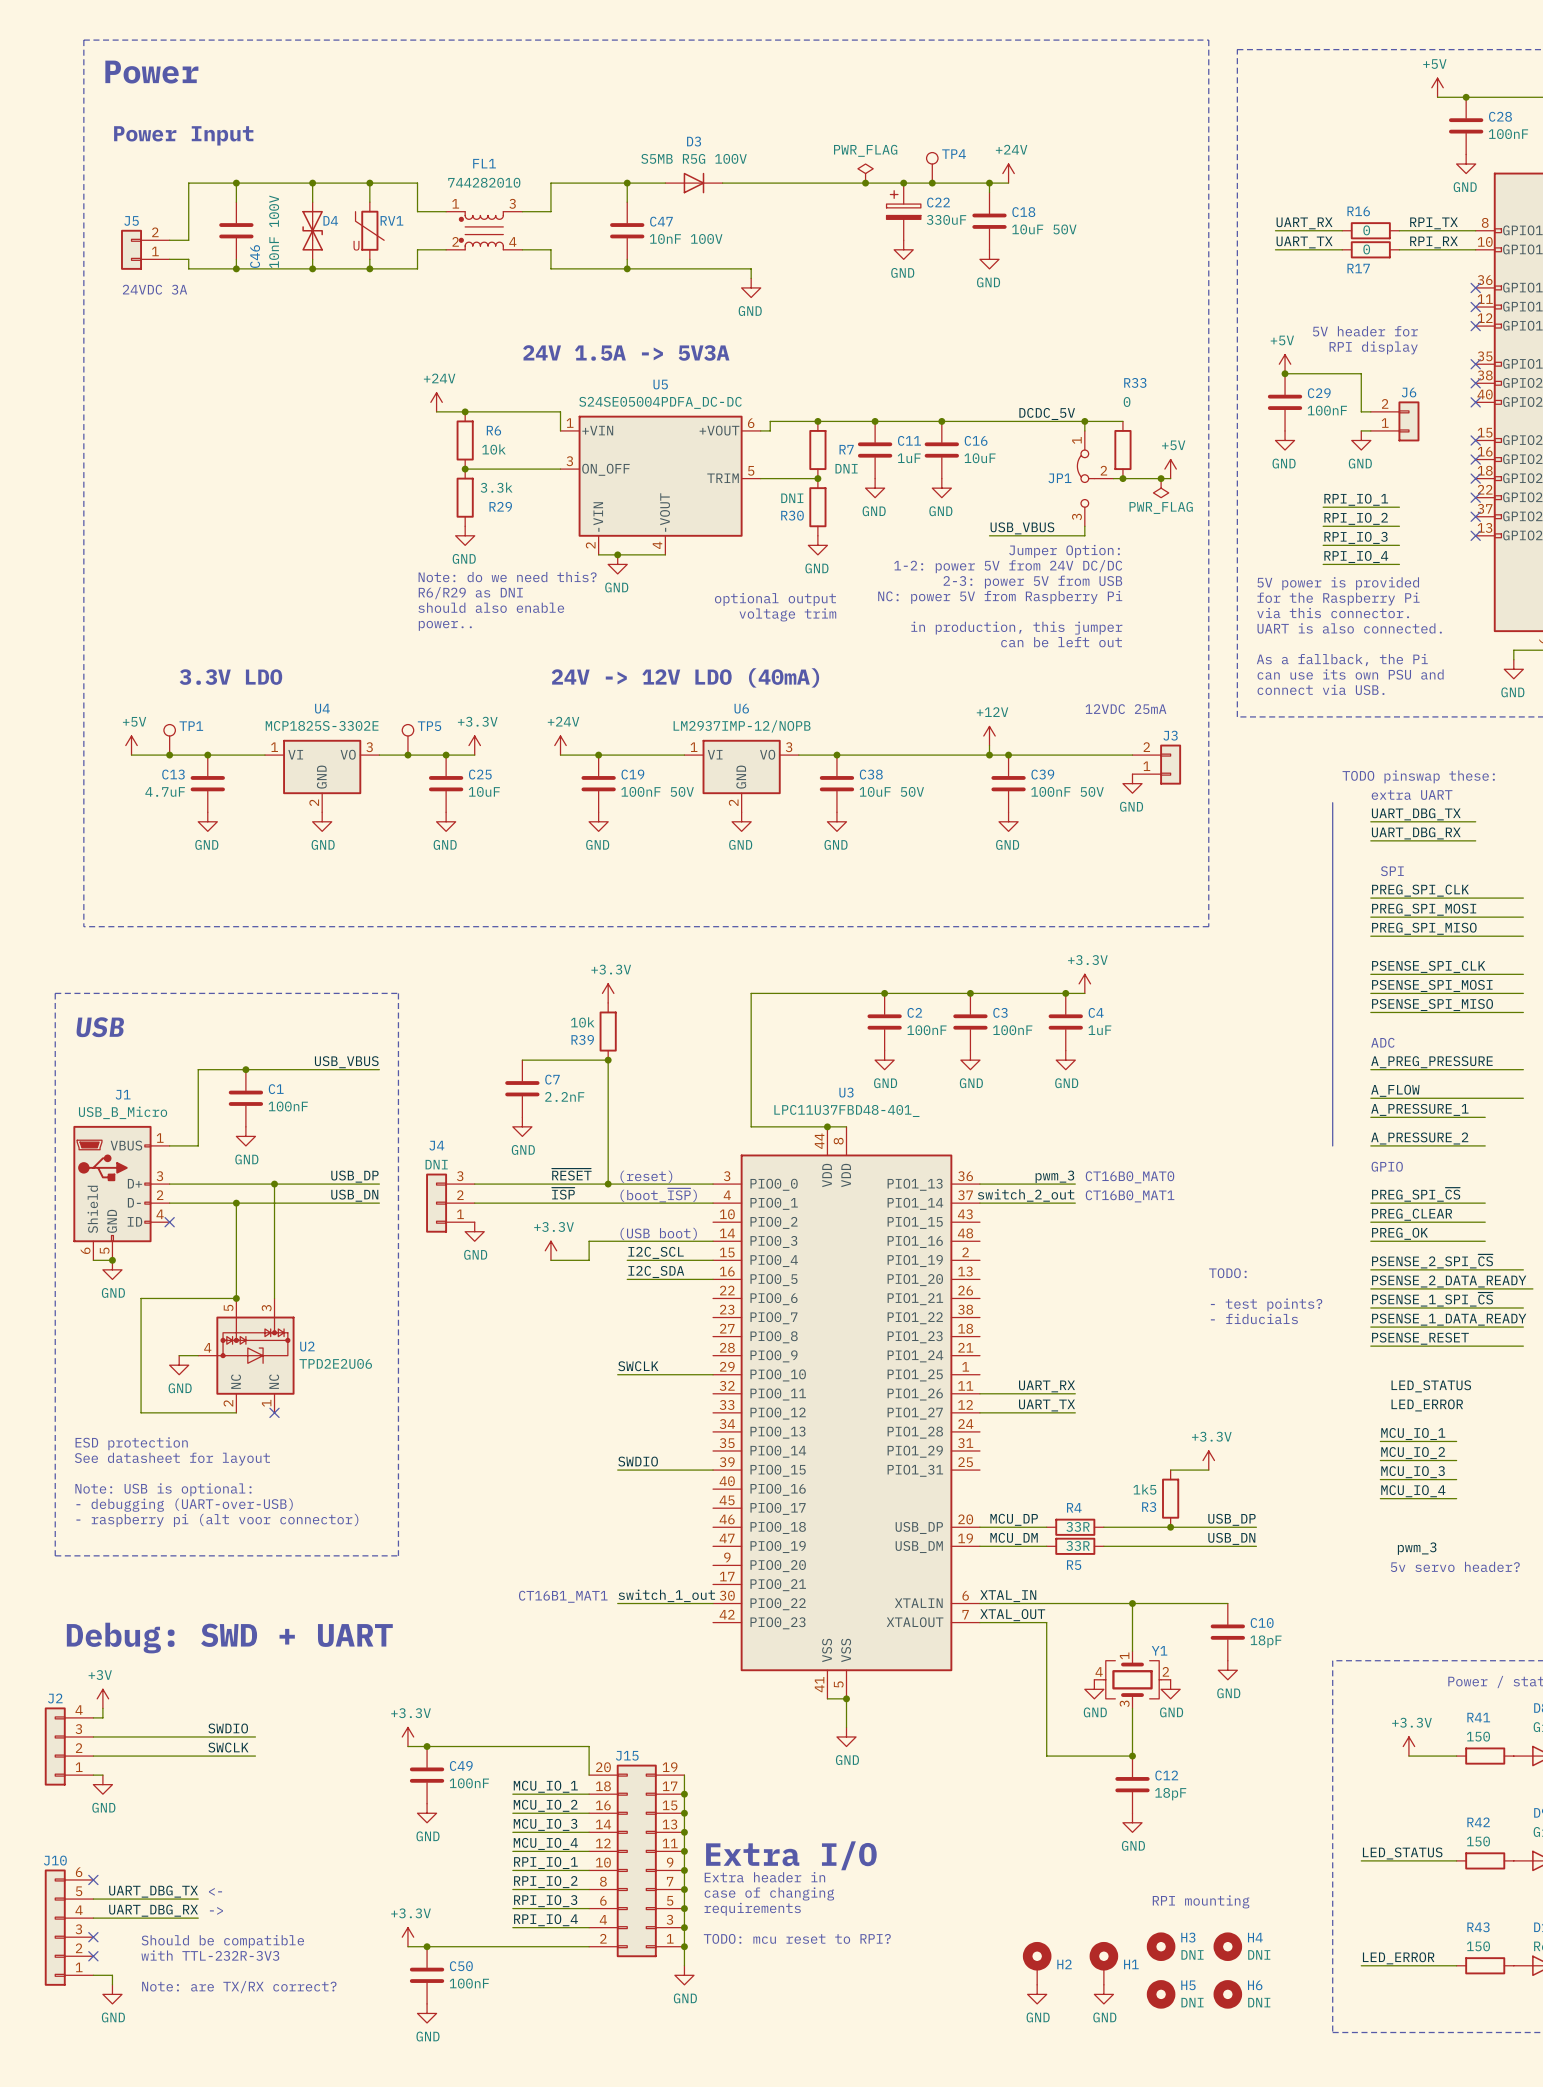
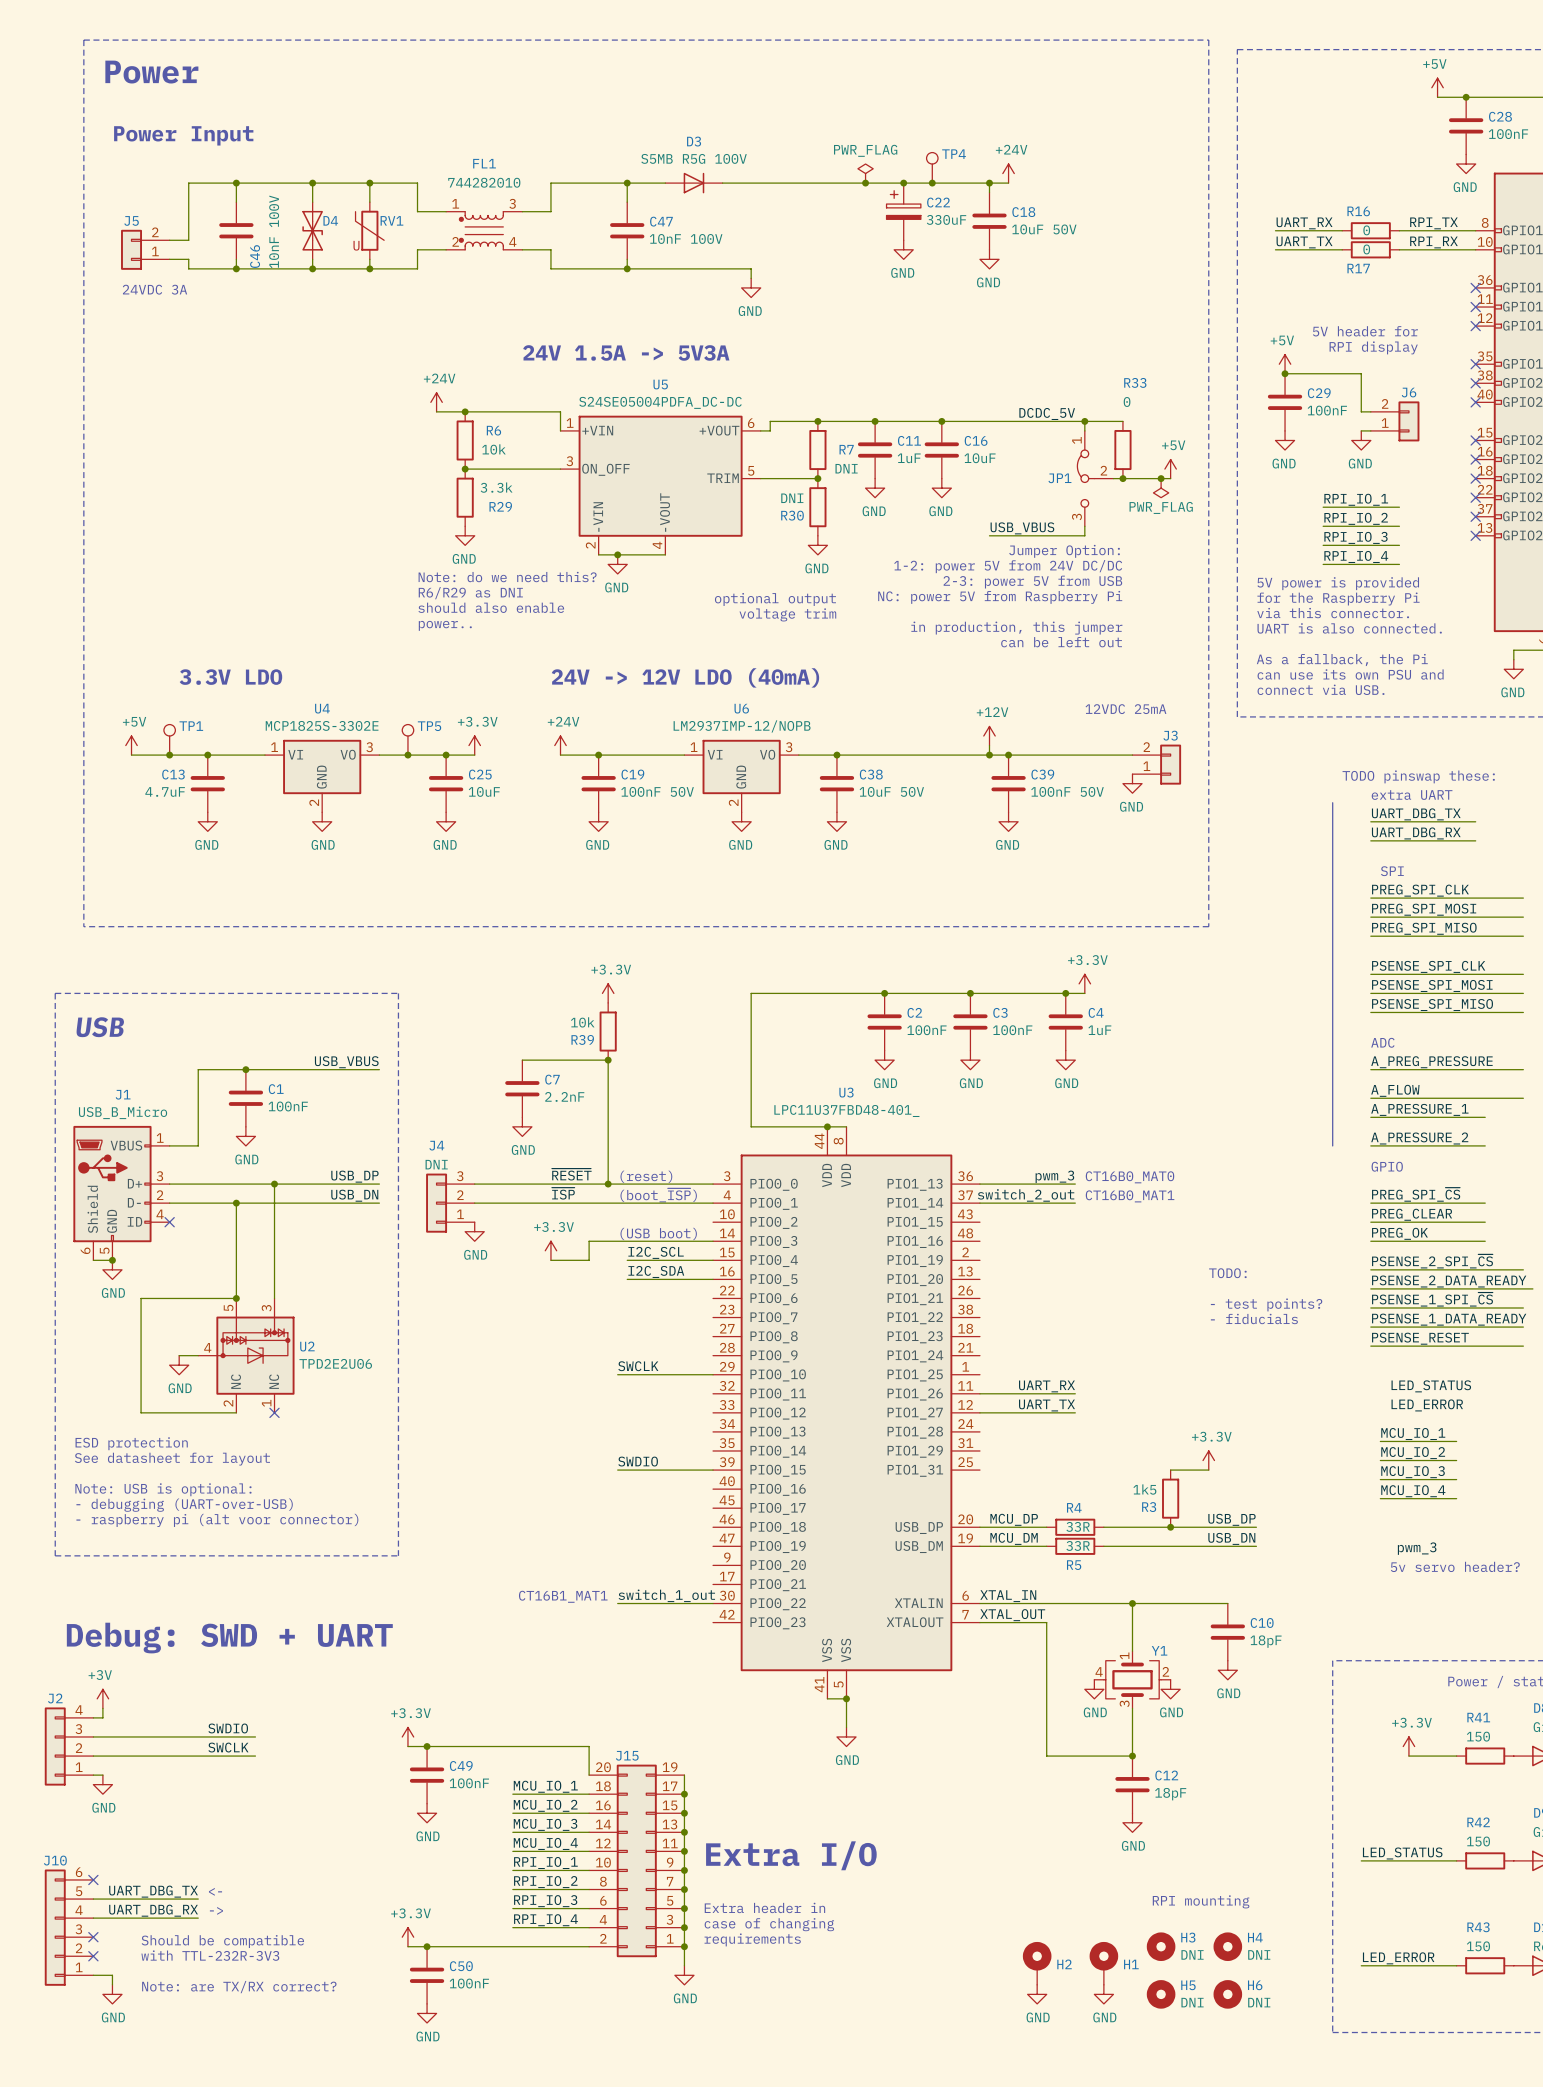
text: Extra header in (764, 1877) -> none
text position: case of changing (769, 1893) -> case of changing (769, 1924)
text: requirements (752, 1909) -> Extra header in (764, 1907)
text: TODO: mcu reset to RPI? (797, 1938) -> requirements (752, 1939)

